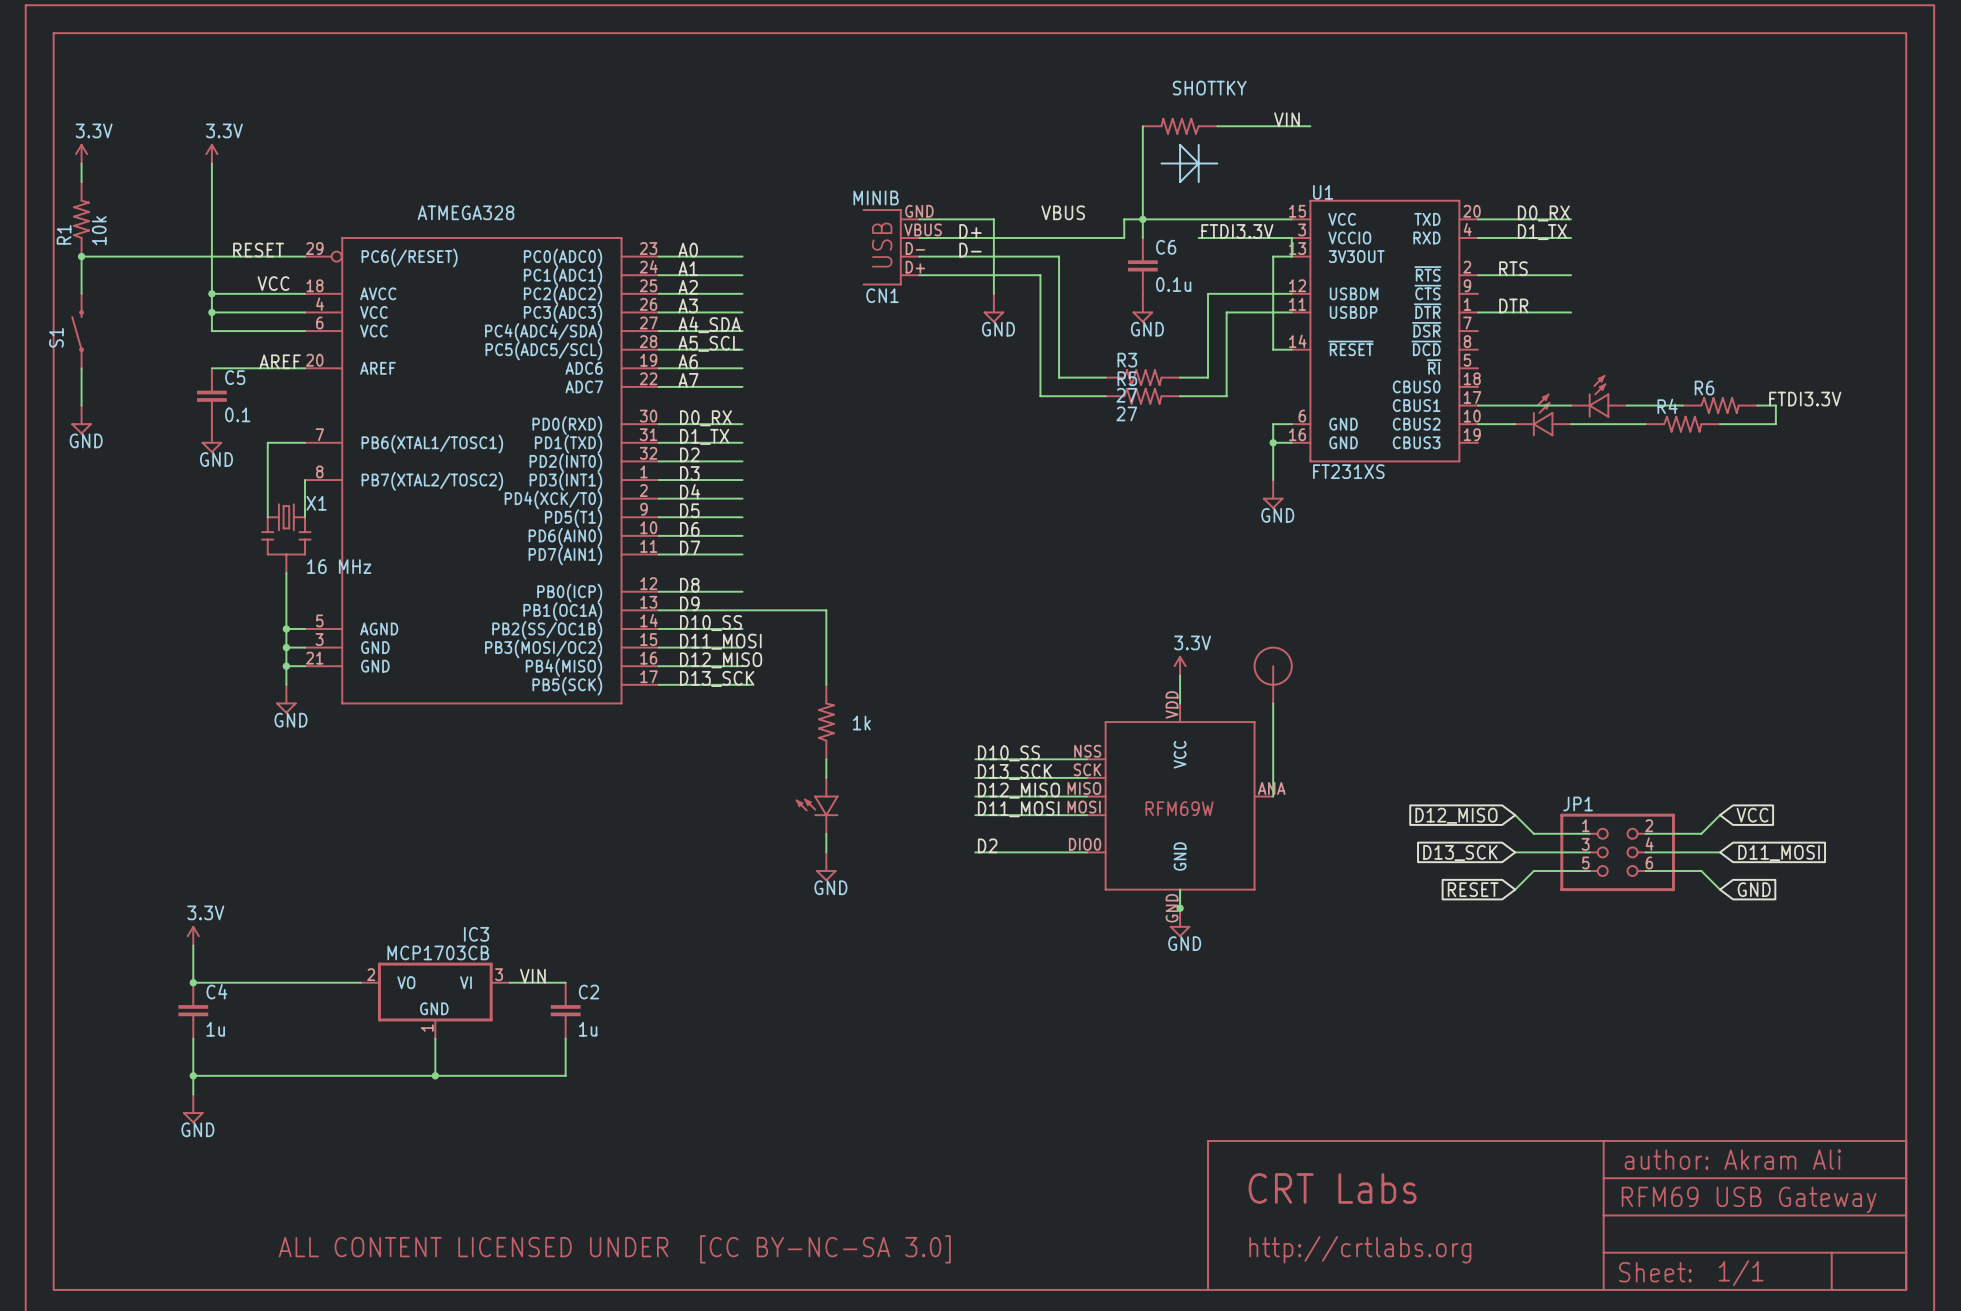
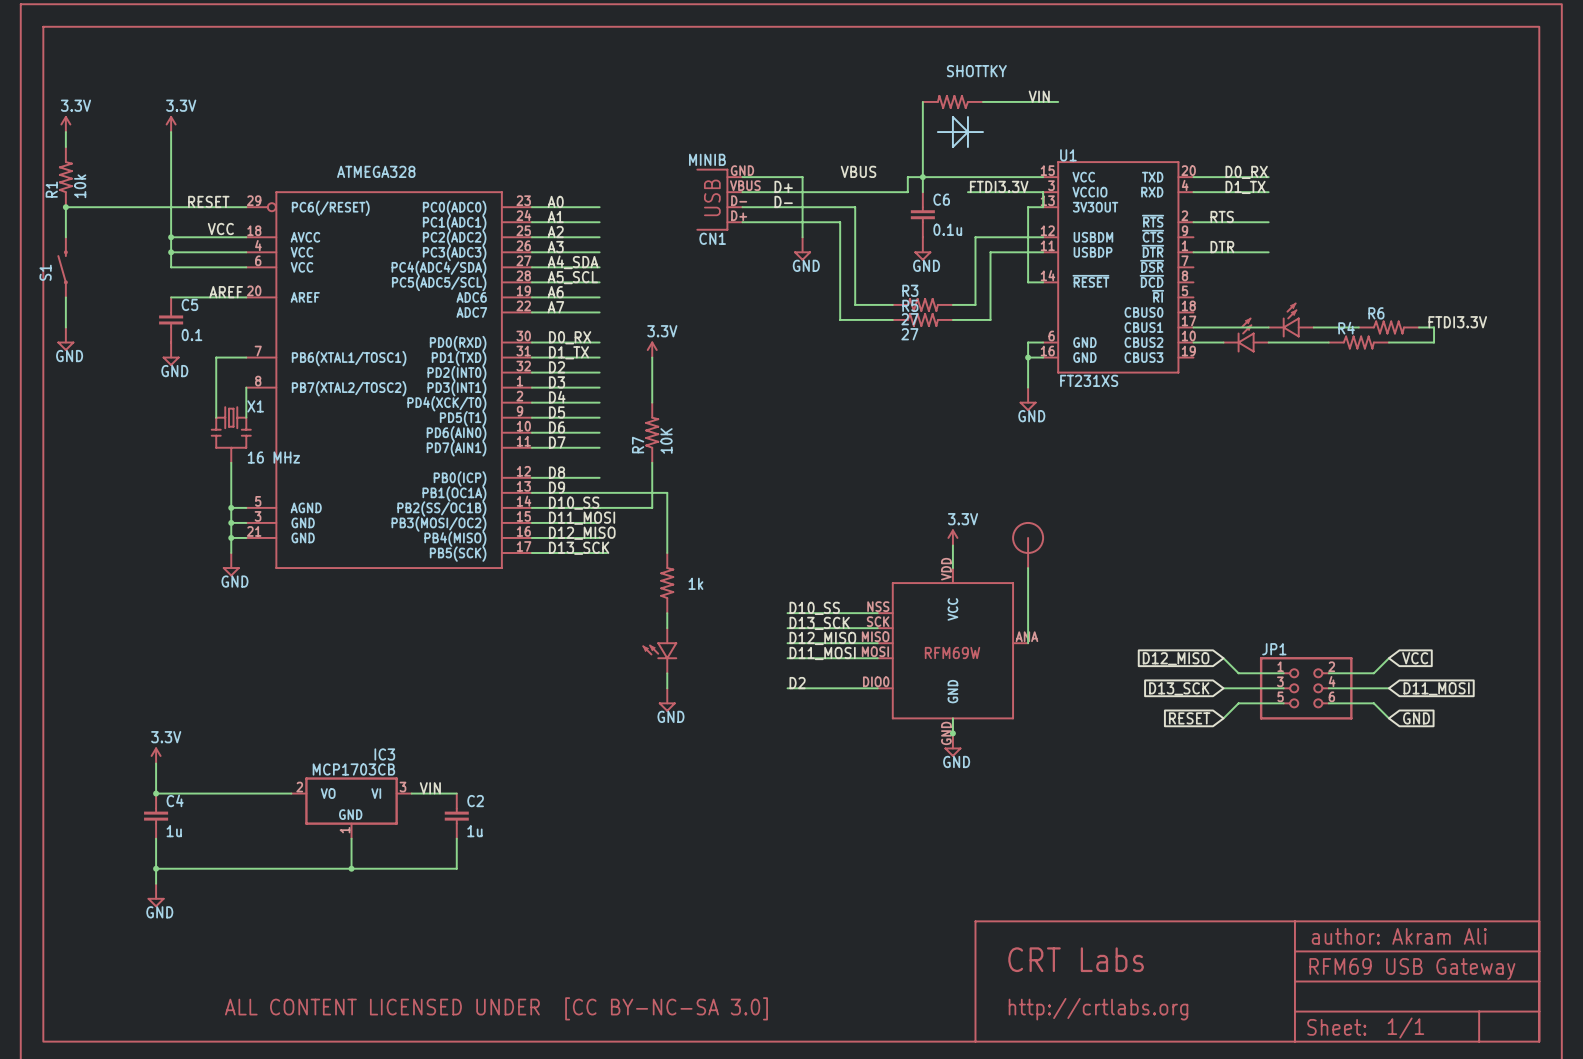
power symbol: none -> 3.3V (652, 349)
wire: none -> (652, 357) (652, 402)
R7: none -> 10K (652, 432)
wire: none -> (652, 462) (652, 507) (599, 507)

